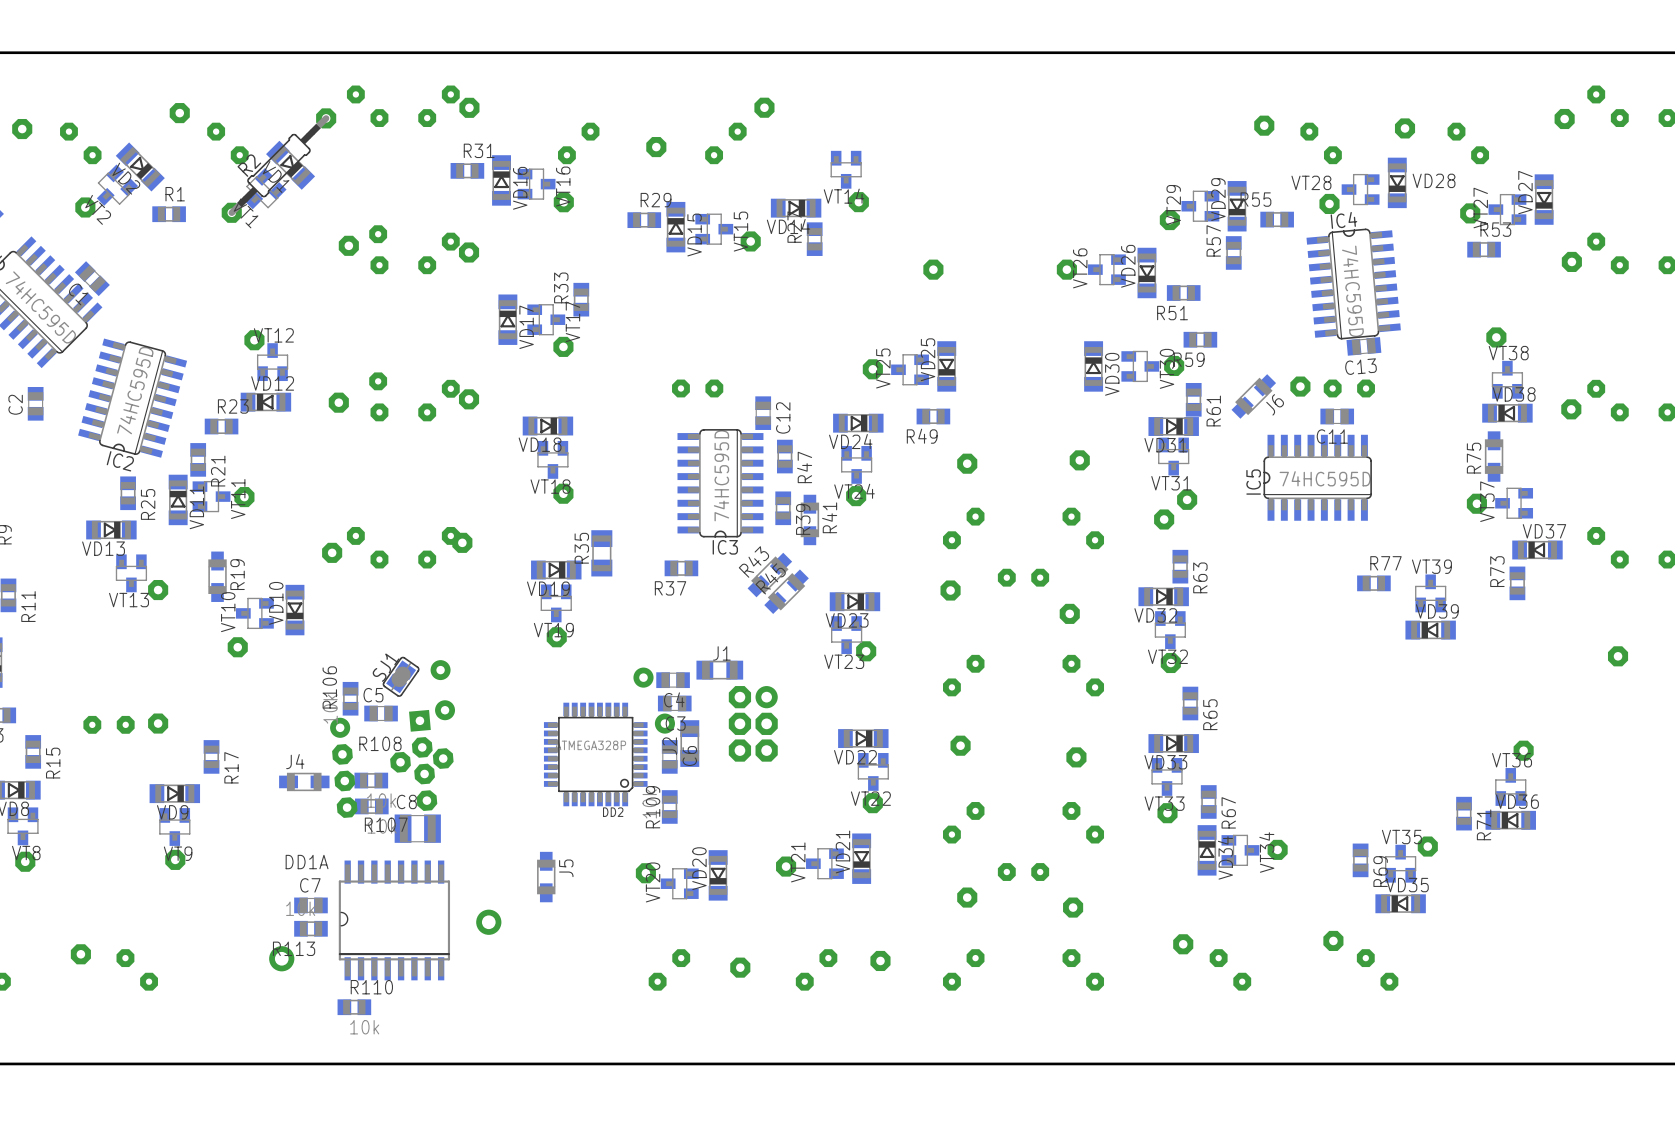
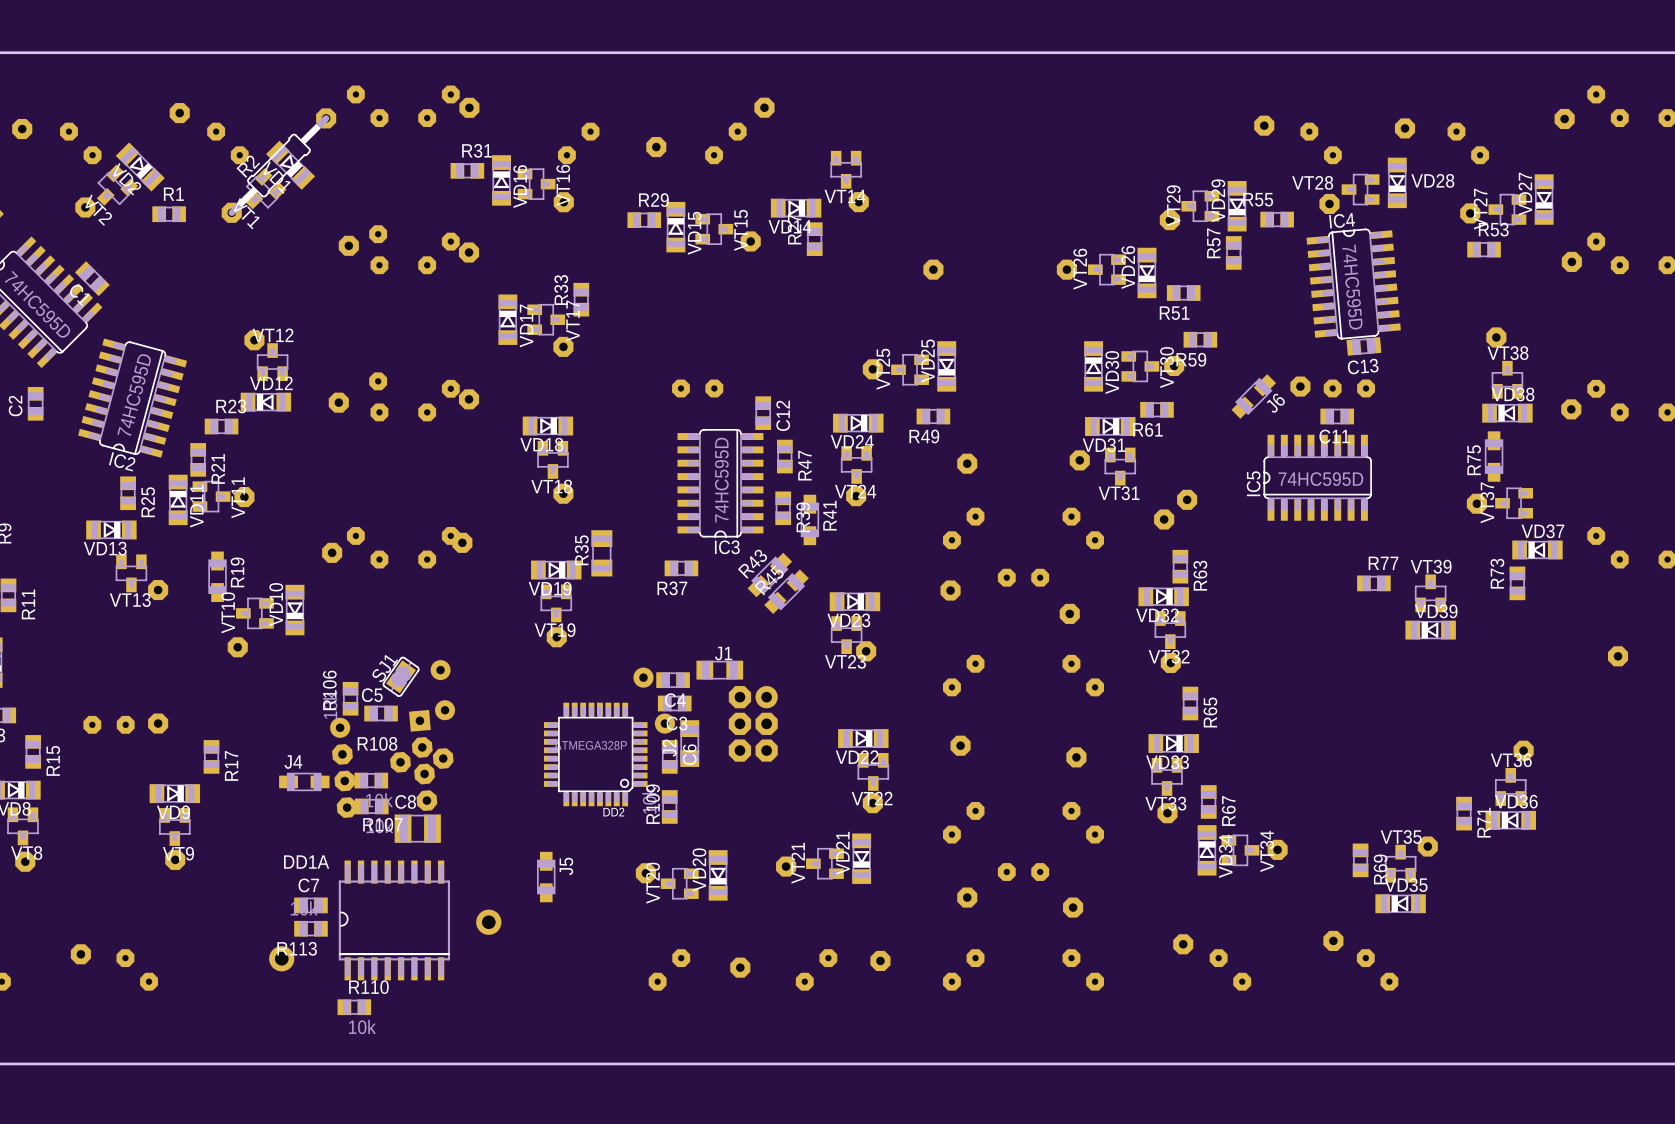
R61 rotation: 0° (1193, 399) -> 90° clockwise (1157, 409)
R61 position: (1193, 399) -> (1157, 409)
VD31 position: (1173, 426) -> (1110, 426)
VT31 position: (1173, 456) -> (1120, 466)

